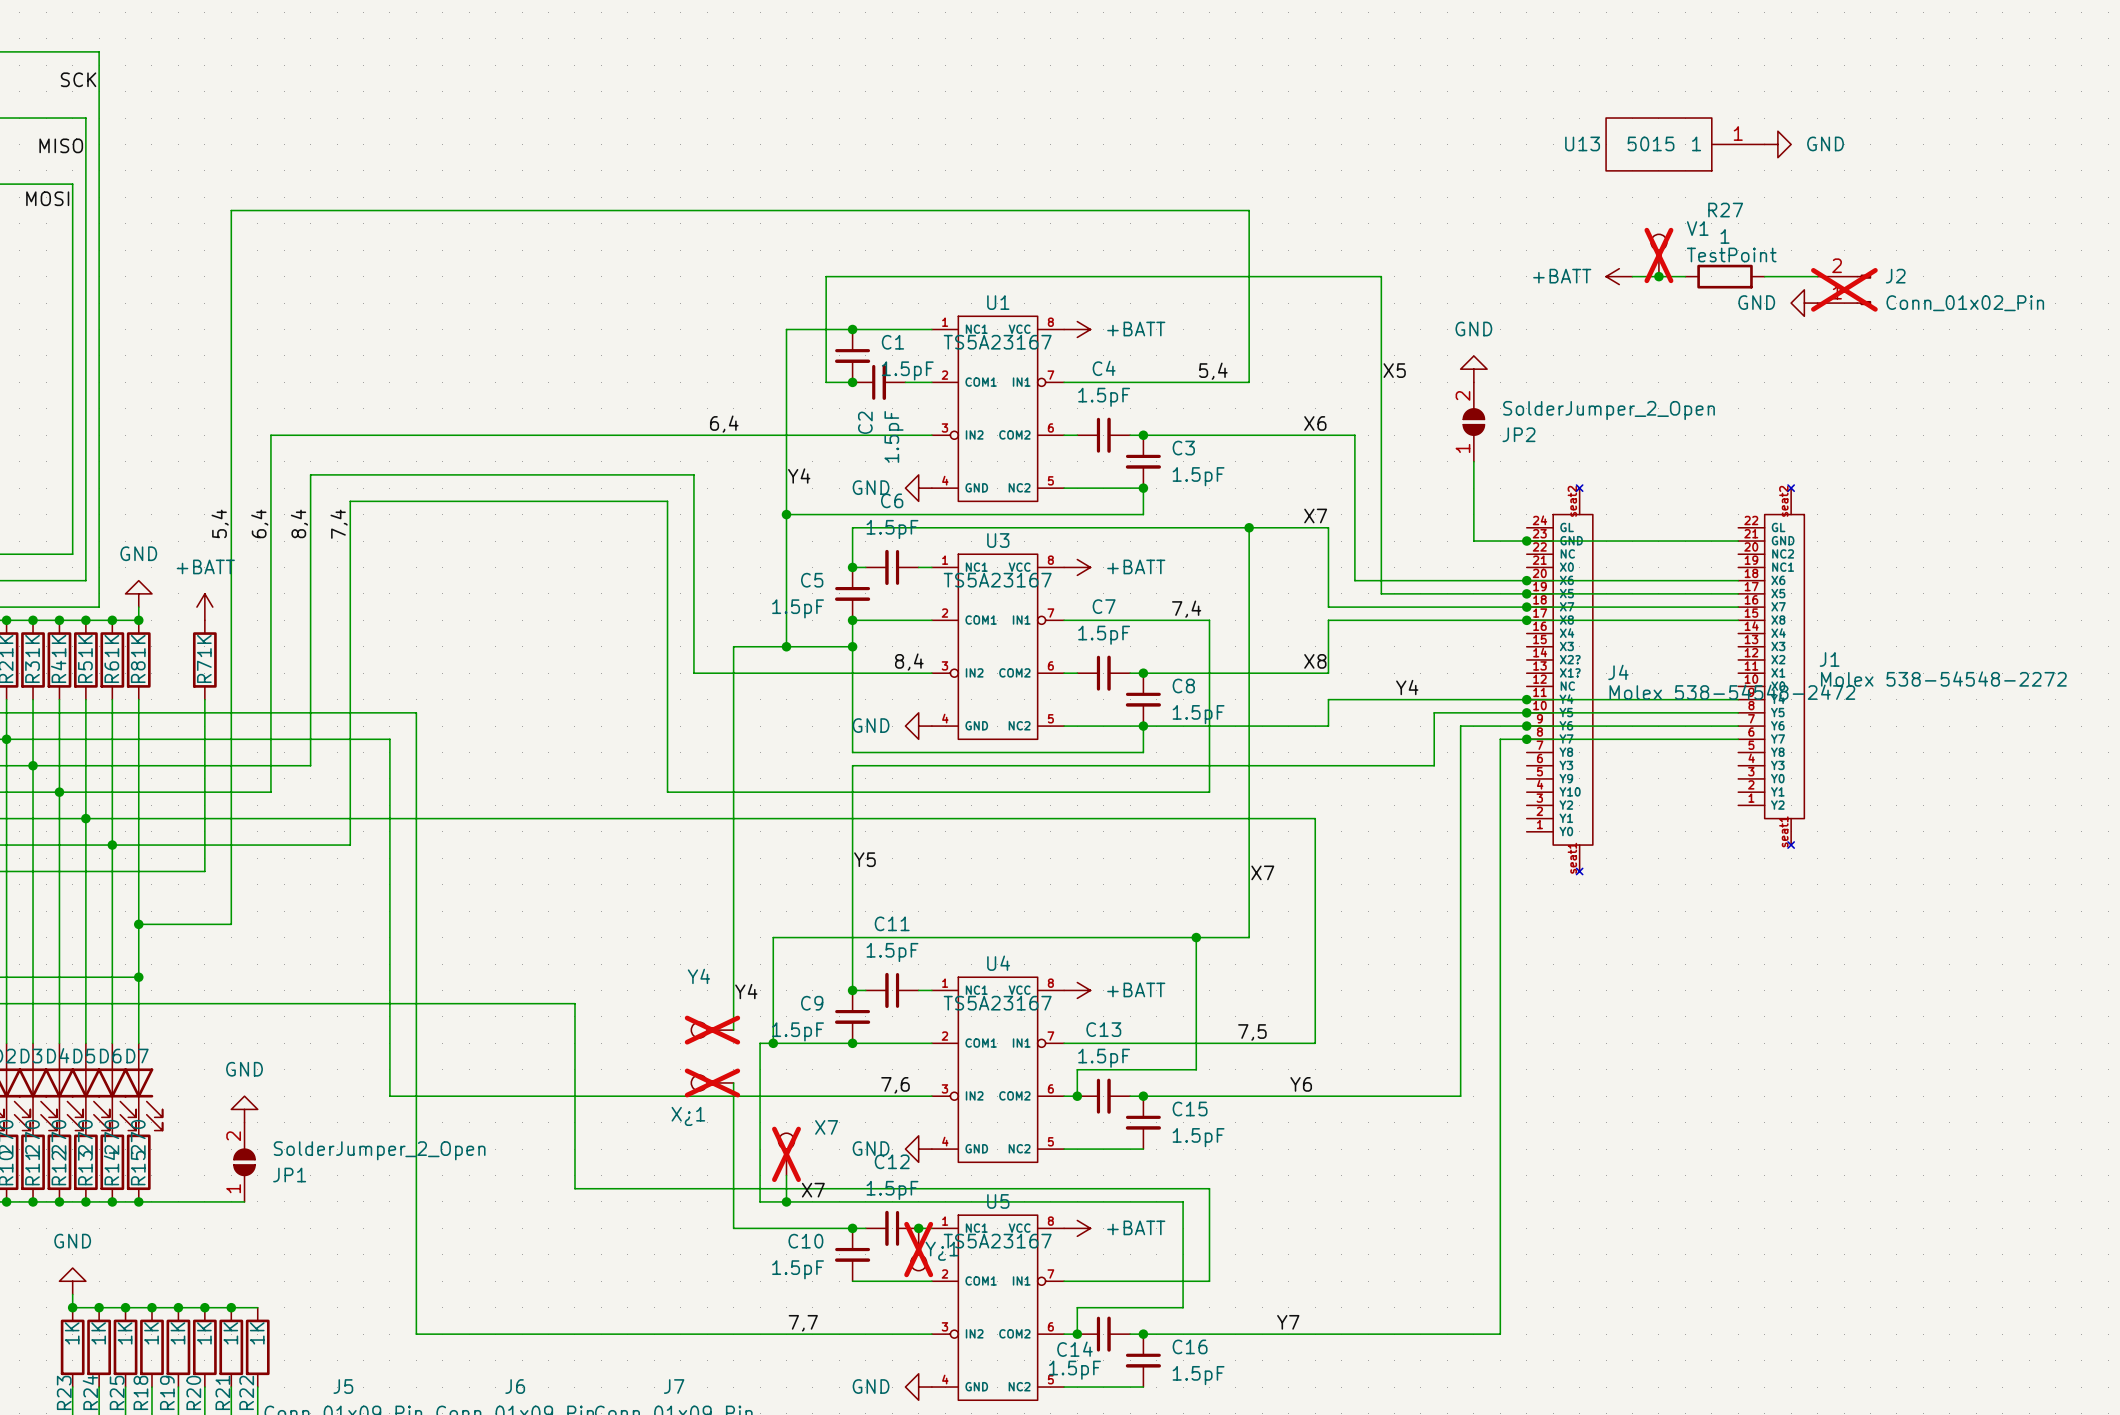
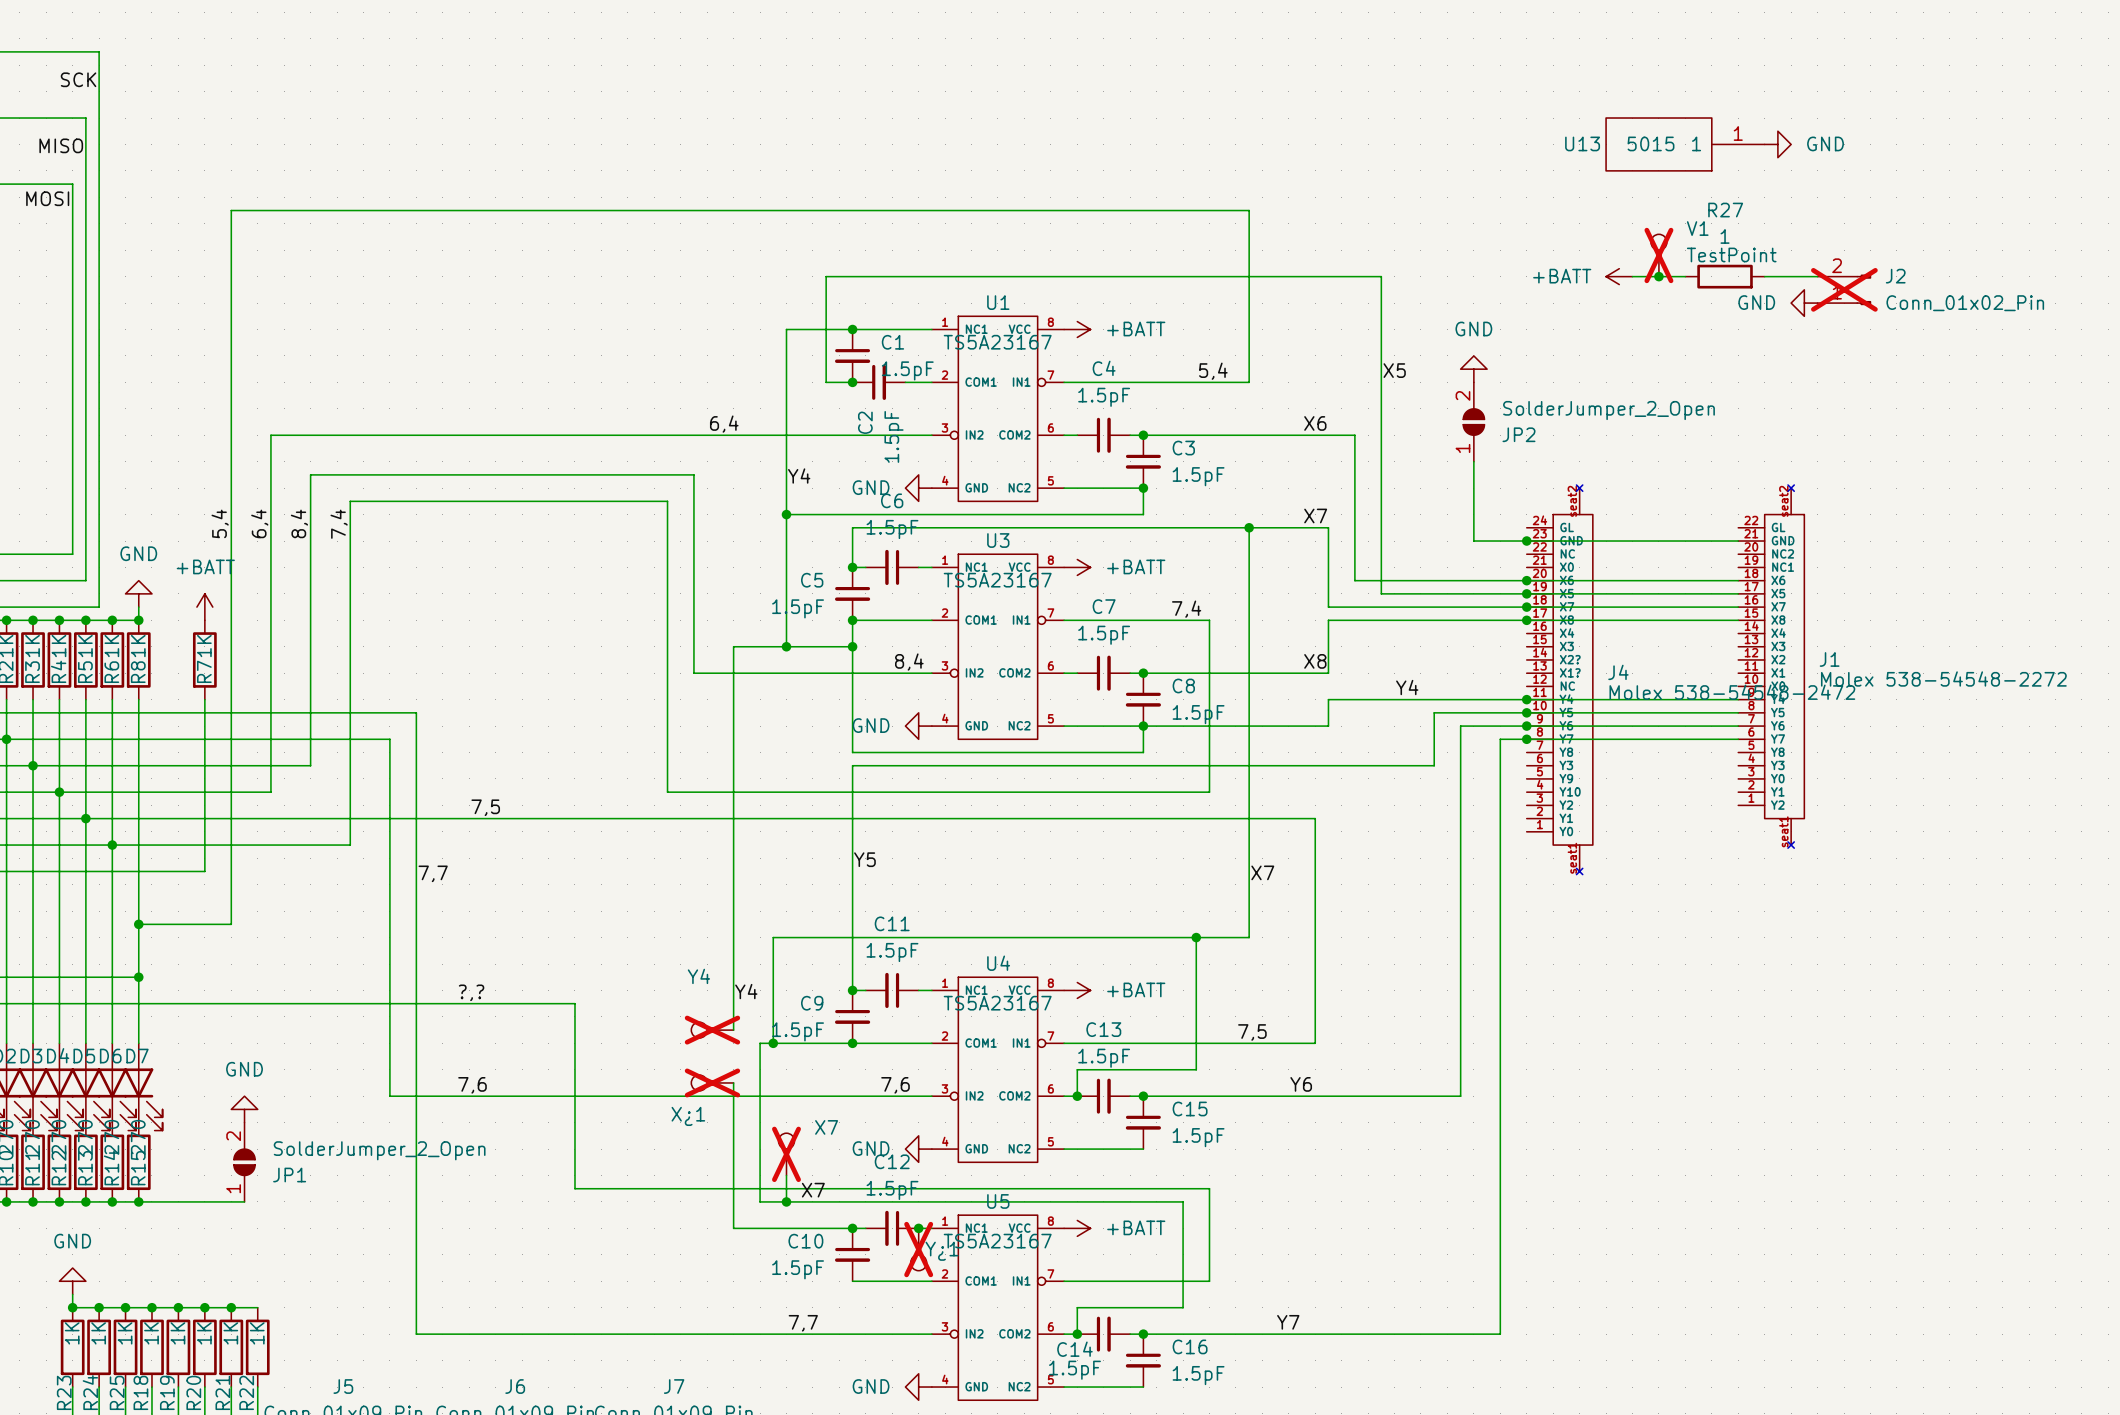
label: none -> 7,5 (485, 807)
label: none -> 7,7 (433, 873)
label: none -> ?,? (471, 992)
label: none -> 7,6 (472, 1085)

